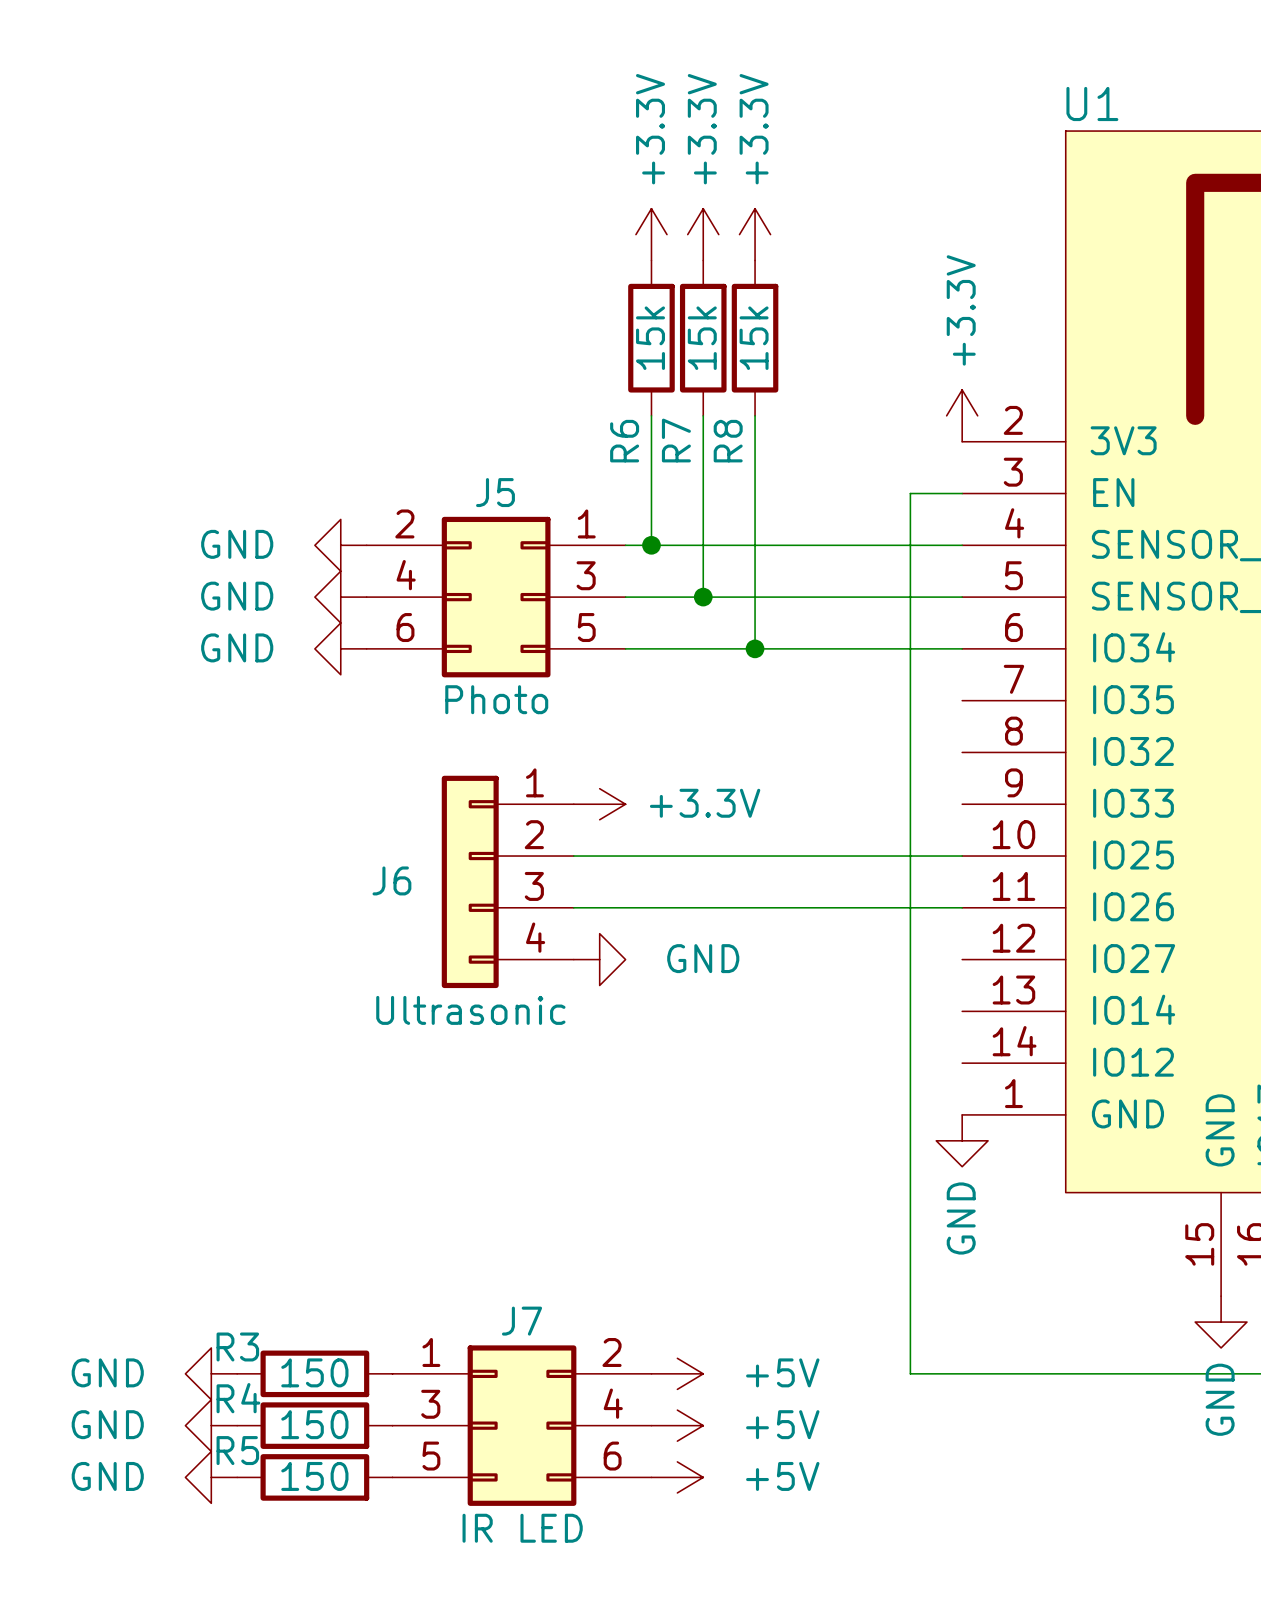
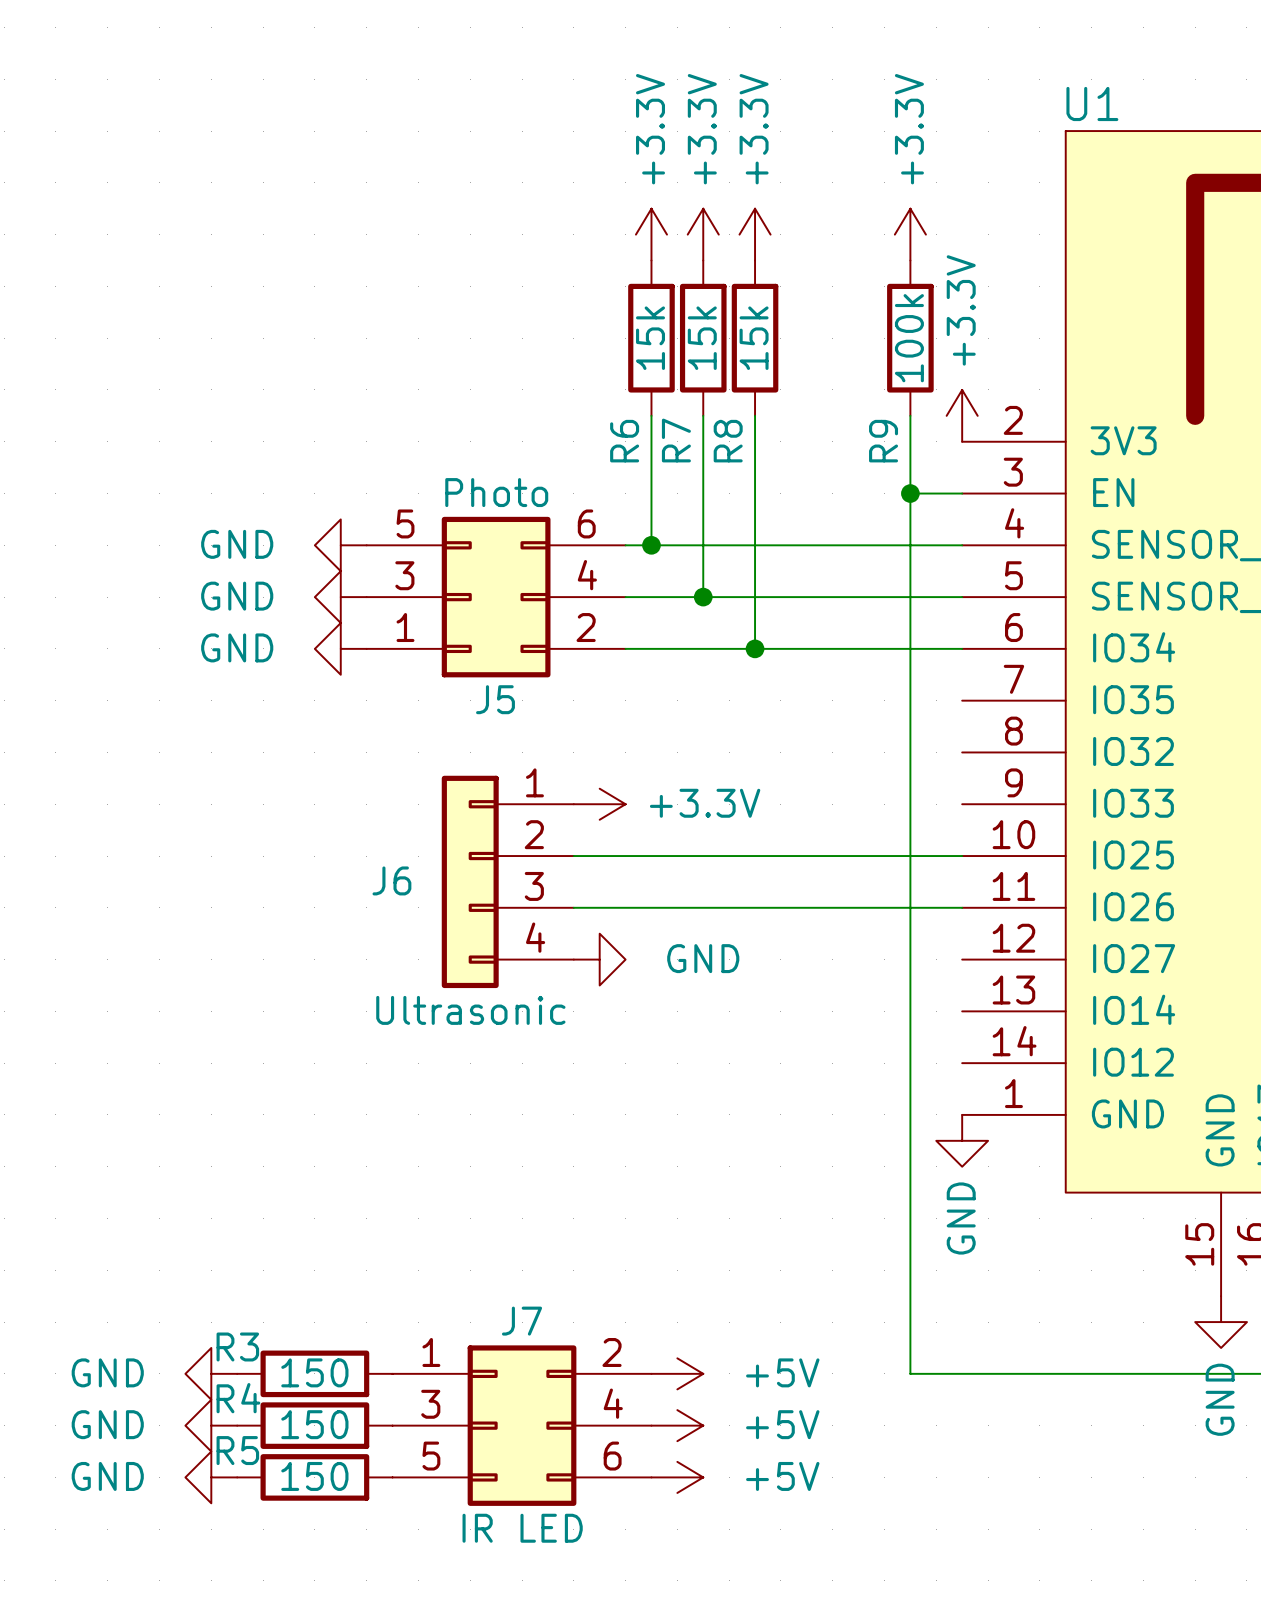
power symbol: none -> +3.3V (910, 234)
R9: none -> 100k (910, 338)
wire: none -> (910, 415) (910, 493)
junction: none -> (910, 493)
J5 rotation: 0° (496, 597) -> 180° (496, 597)

